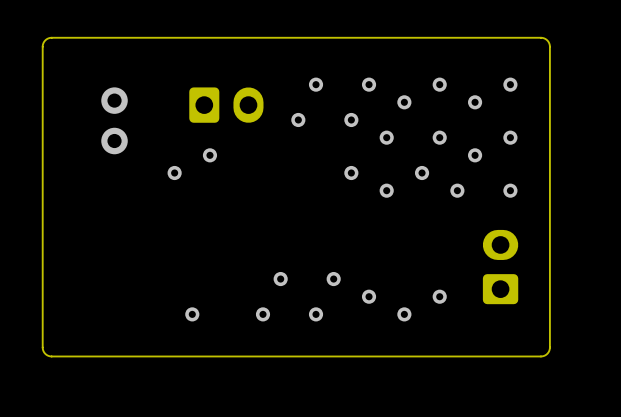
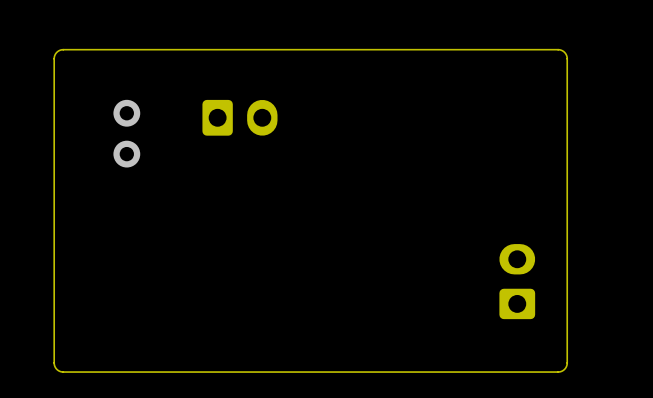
via: (316, 84) -> none
via: (369, 84) -> none
via: (439, 84) -> none
via: (510, 84) -> none
via: (404, 102) -> none
via: (475, 102) -> none
via: (298, 119) -> none
via: (351, 119) -> none
via: (386, 137) -> none
via: (439, 137) -> none
via: (510, 137) -> none
via: (209, 155) -> none
via: (475, 155) -> none
via: (174, 173) -> none
via: (351, 173) -> none
via: (422, 173) -> none
via: (386, 190) -> none
via: (457, 190) -> none
via: (510, 190) -> none
via: (280, 279) -> none
via: (333, 279) -> none
via: (369, 296) -> none
via: (439, 296) -> none
via: (192, 314) -> none
via: (262, 314) -> none
via: (316, 314) -> none
via: (404, 314) -> none

